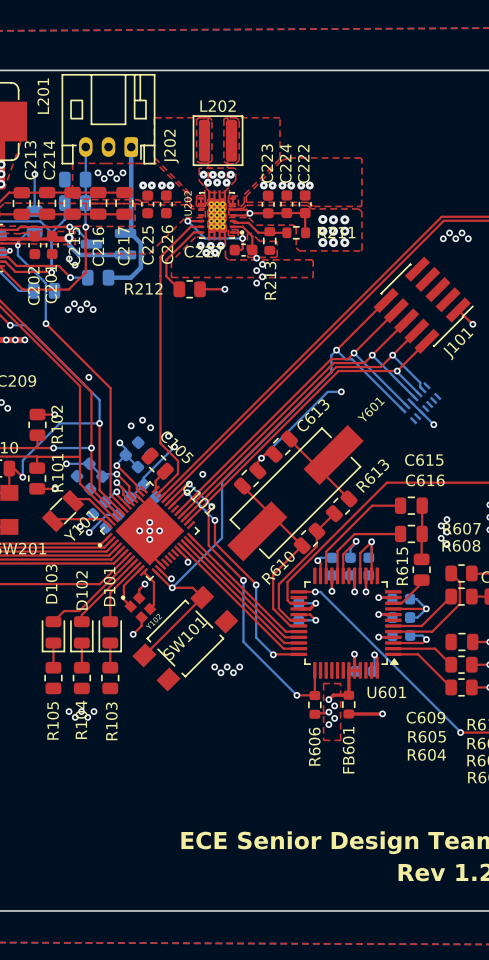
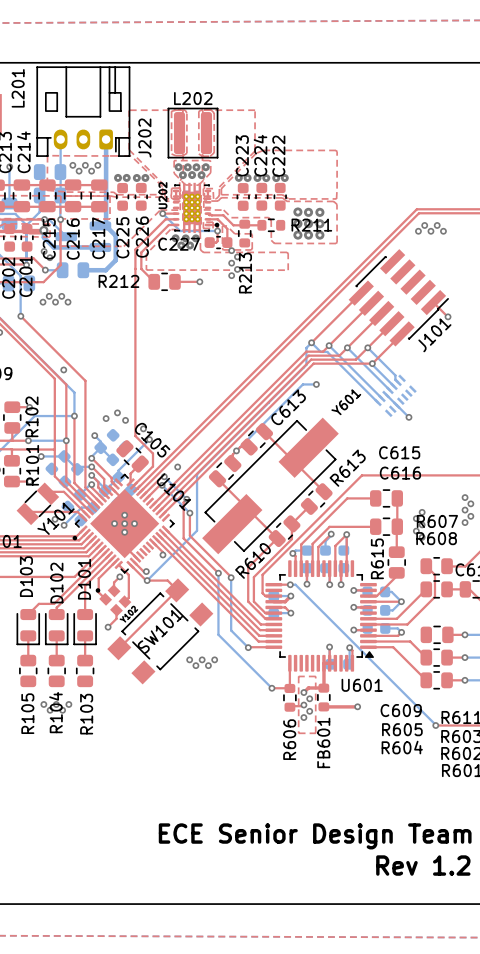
top track: (232, 209) (246, 209) (249, 213) -> none
top track: (249, 213) (286, 213) -> none
top track: (249, 213) (247, 215) (232, 215) -> none
via: (249, 213) -> none
top track: (286, 213) (305, 213) (305, 232) -> none

